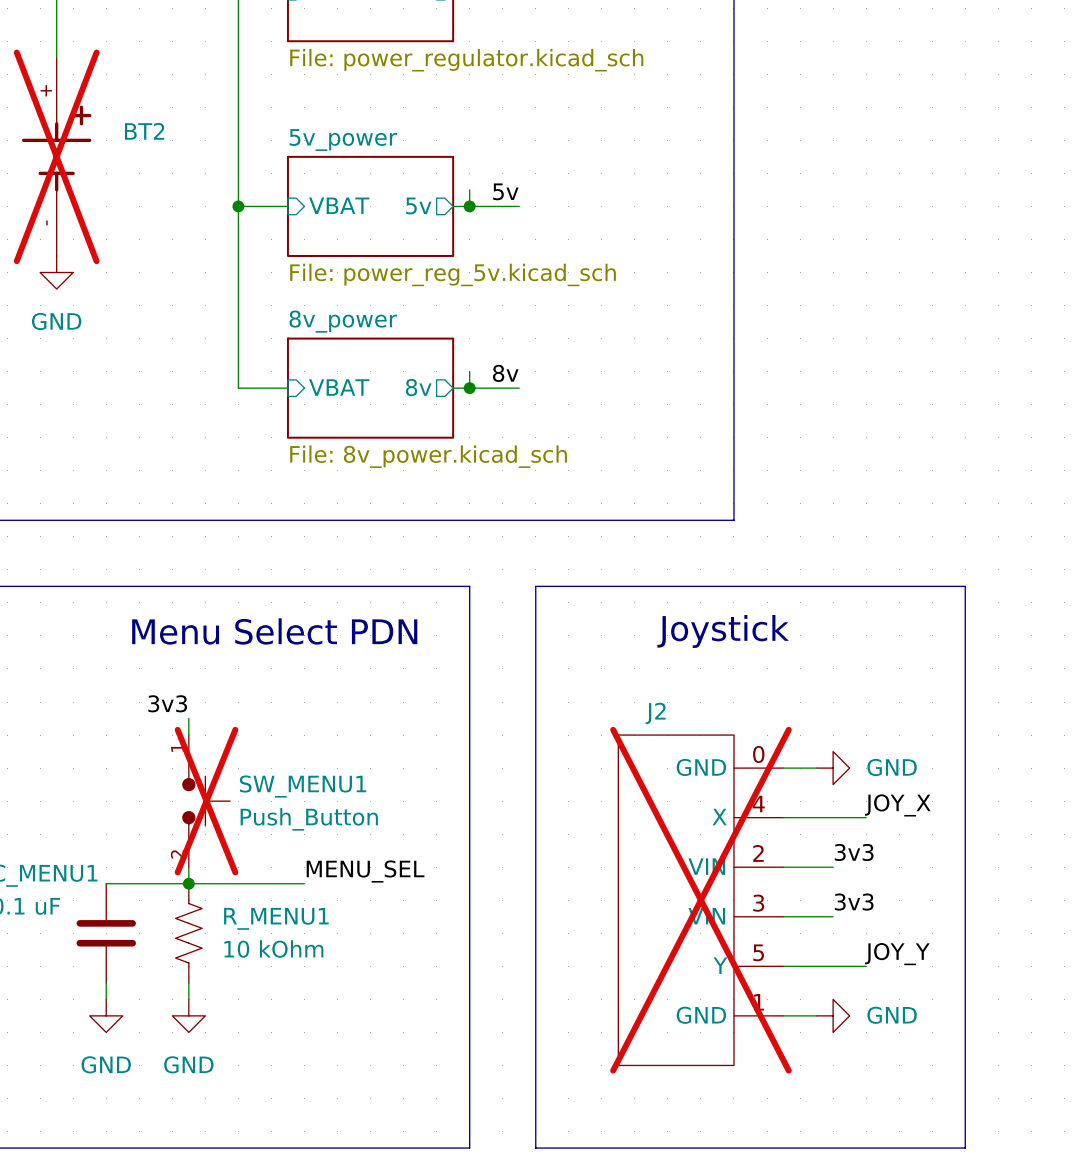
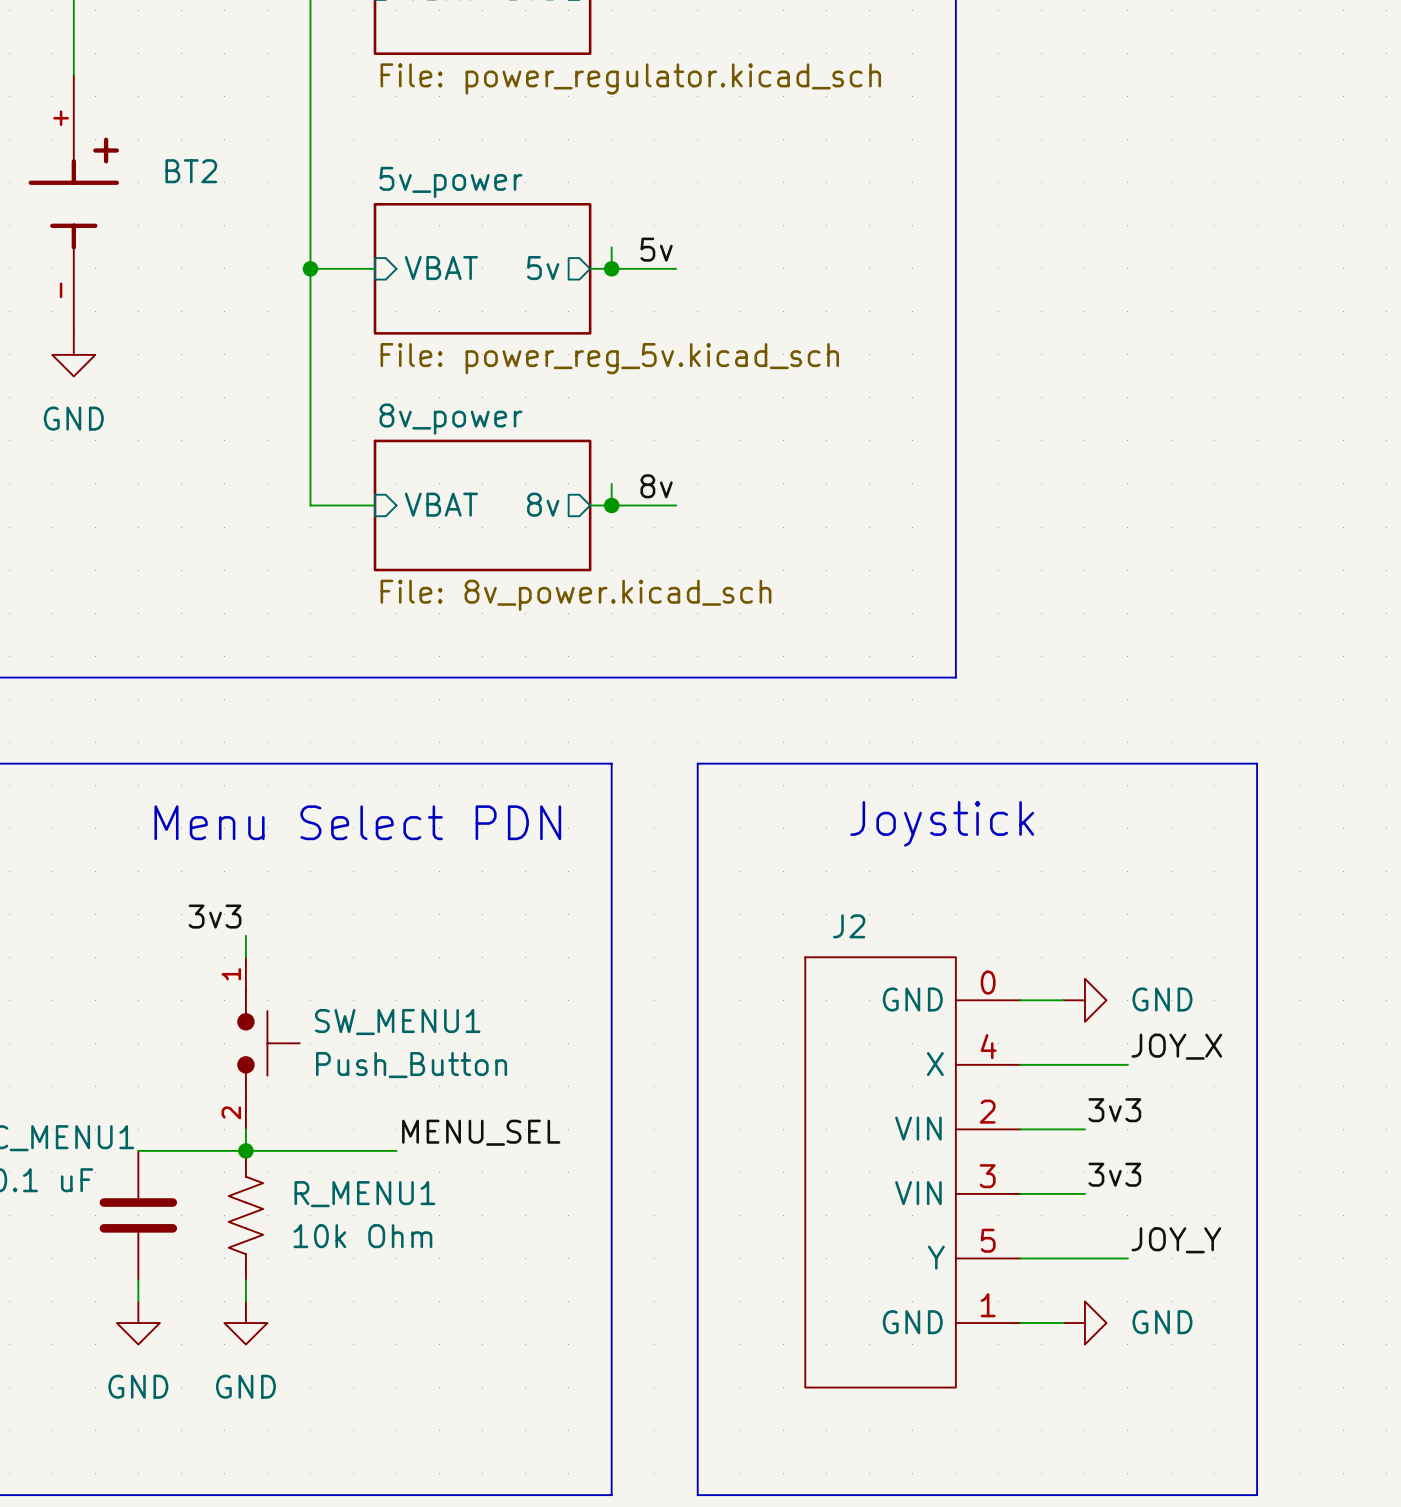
BT2 do-not-place cross: (56, 156) -> none
SW_MENU1 do-not-place cross: (206, 801) -> none
J2 do-not-place cross: (700, 900) -> none
R_MENU1 value: 10 kOhm (273, 949) -> 10k Ohm (362, 1236)

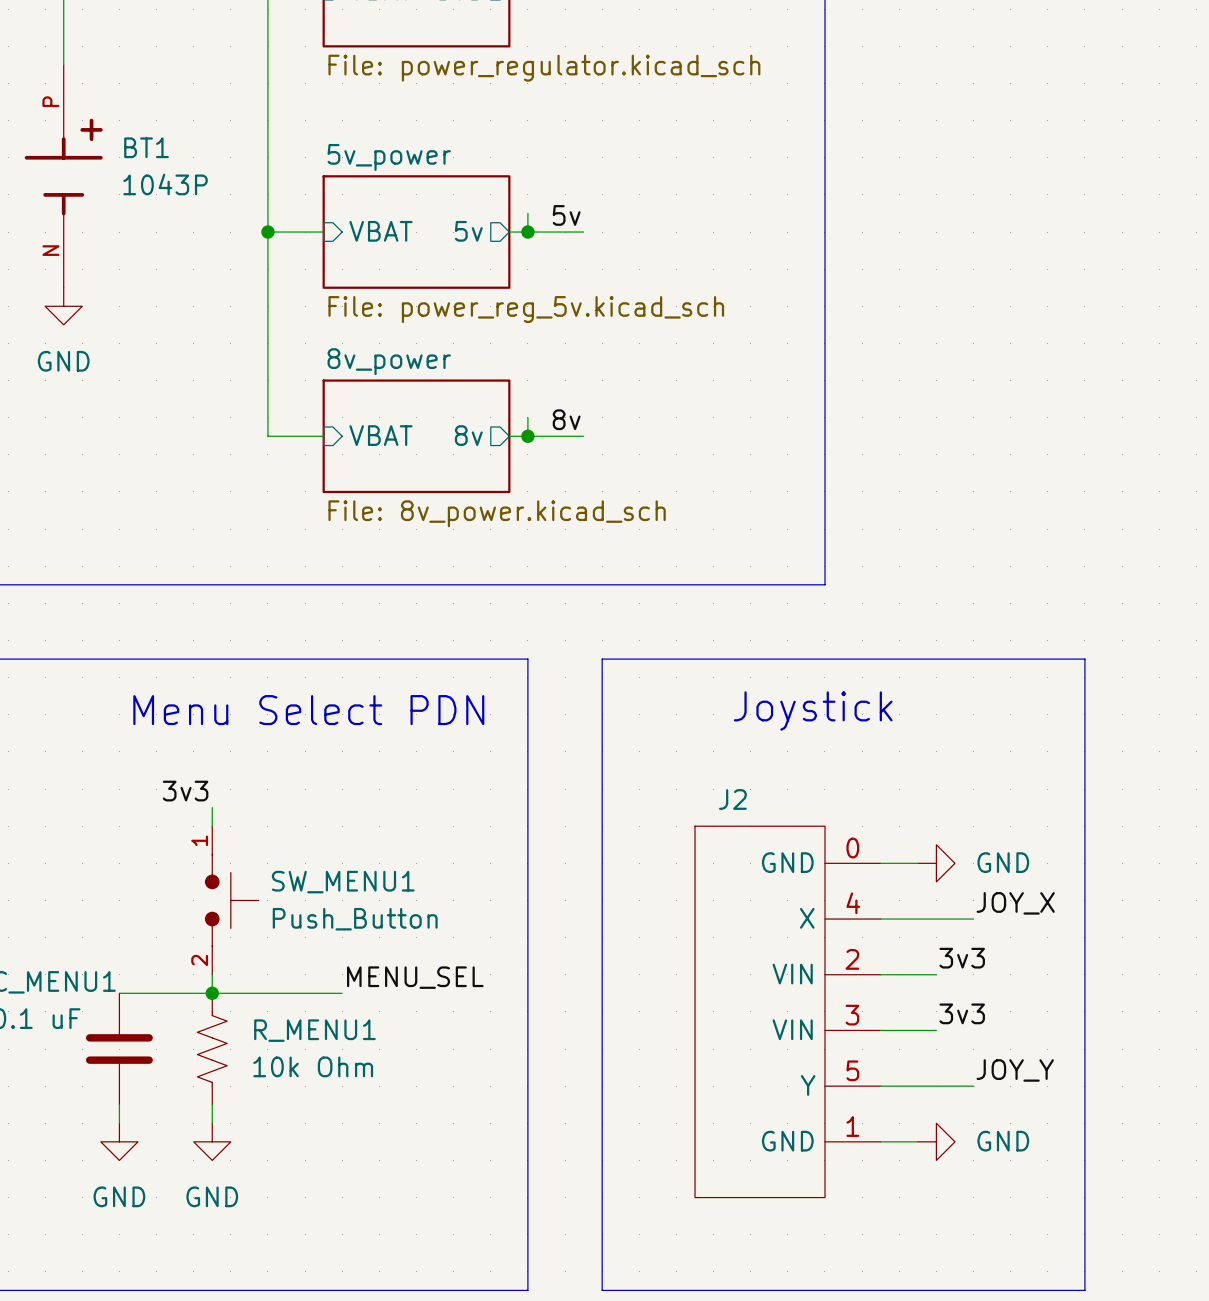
BT2 pin number: + (61, 118) -> P (50, 101)
BT2 name: BT2 (191, 171) -> BT1 (146, 147)
BT2 value: none -> 1043P (165, 184)
BT2 pin number: - (61, 290) -> N (50, 250)

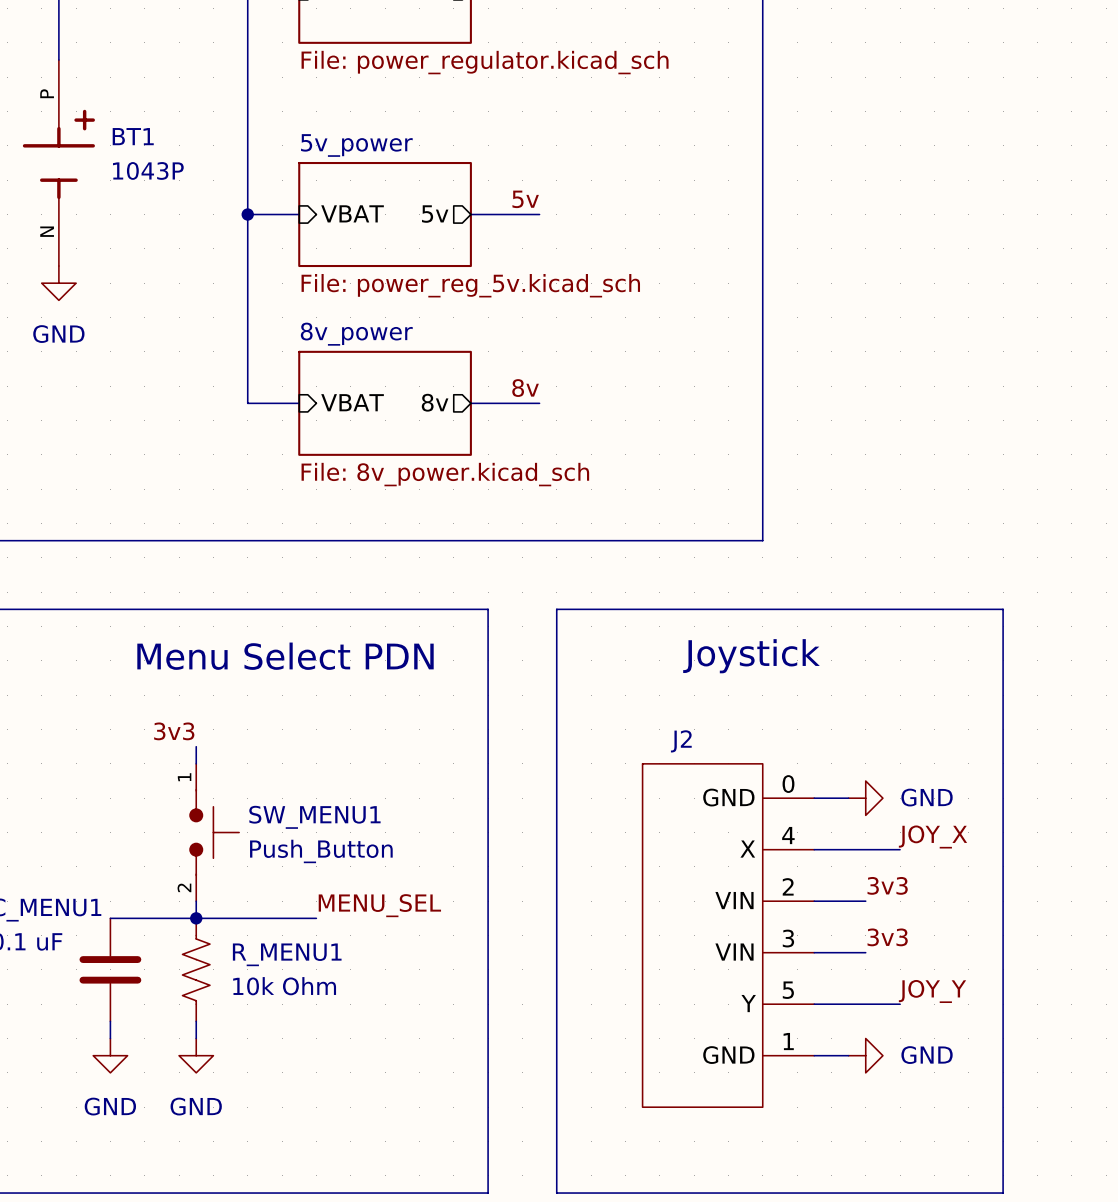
wire: (527, 213) (527, 232) -> none
junction: (527, 232) -> none
wire: (527, 417) (527, 436) -> none
junction: (527, 436) -> none

